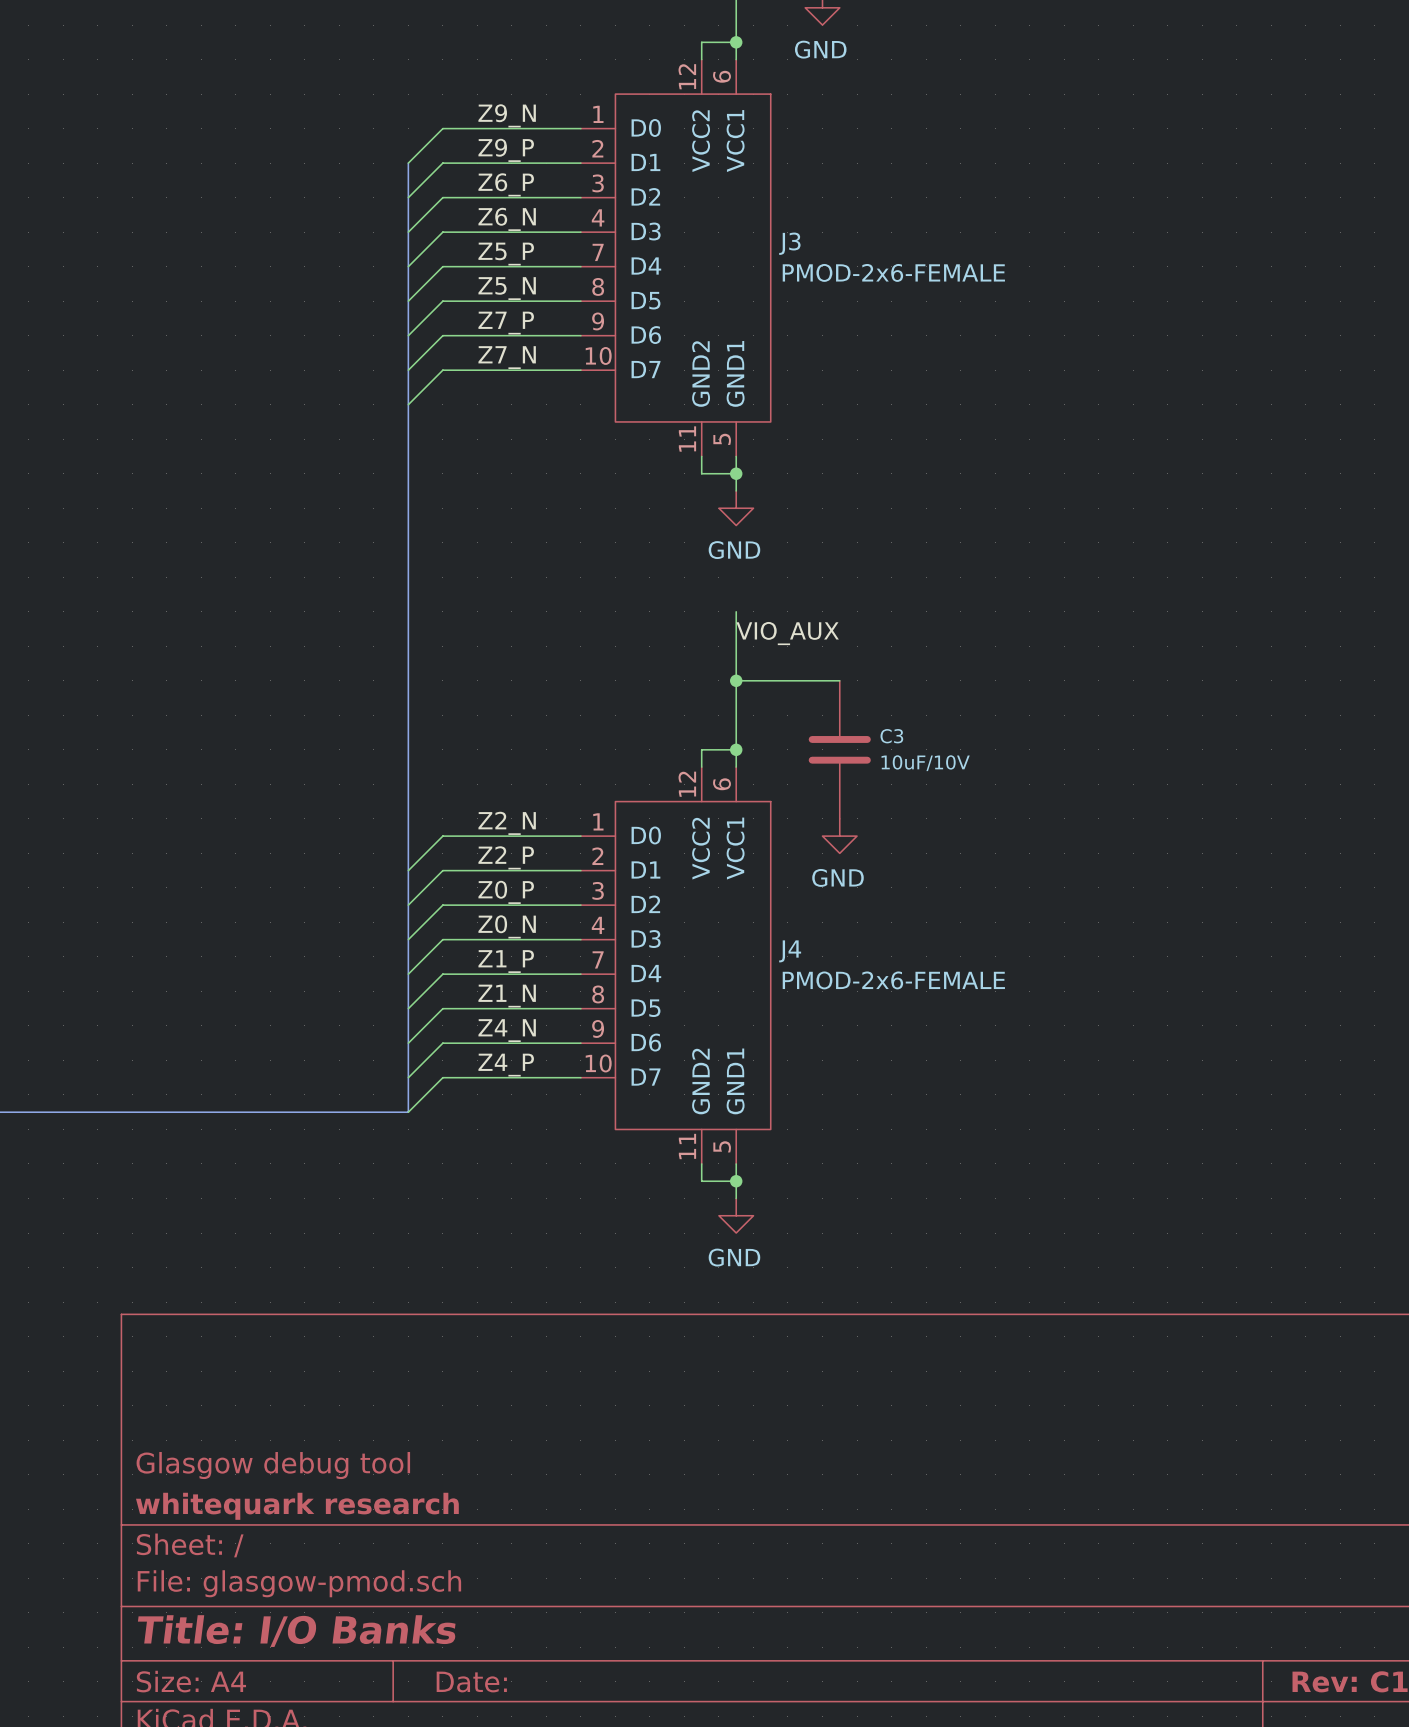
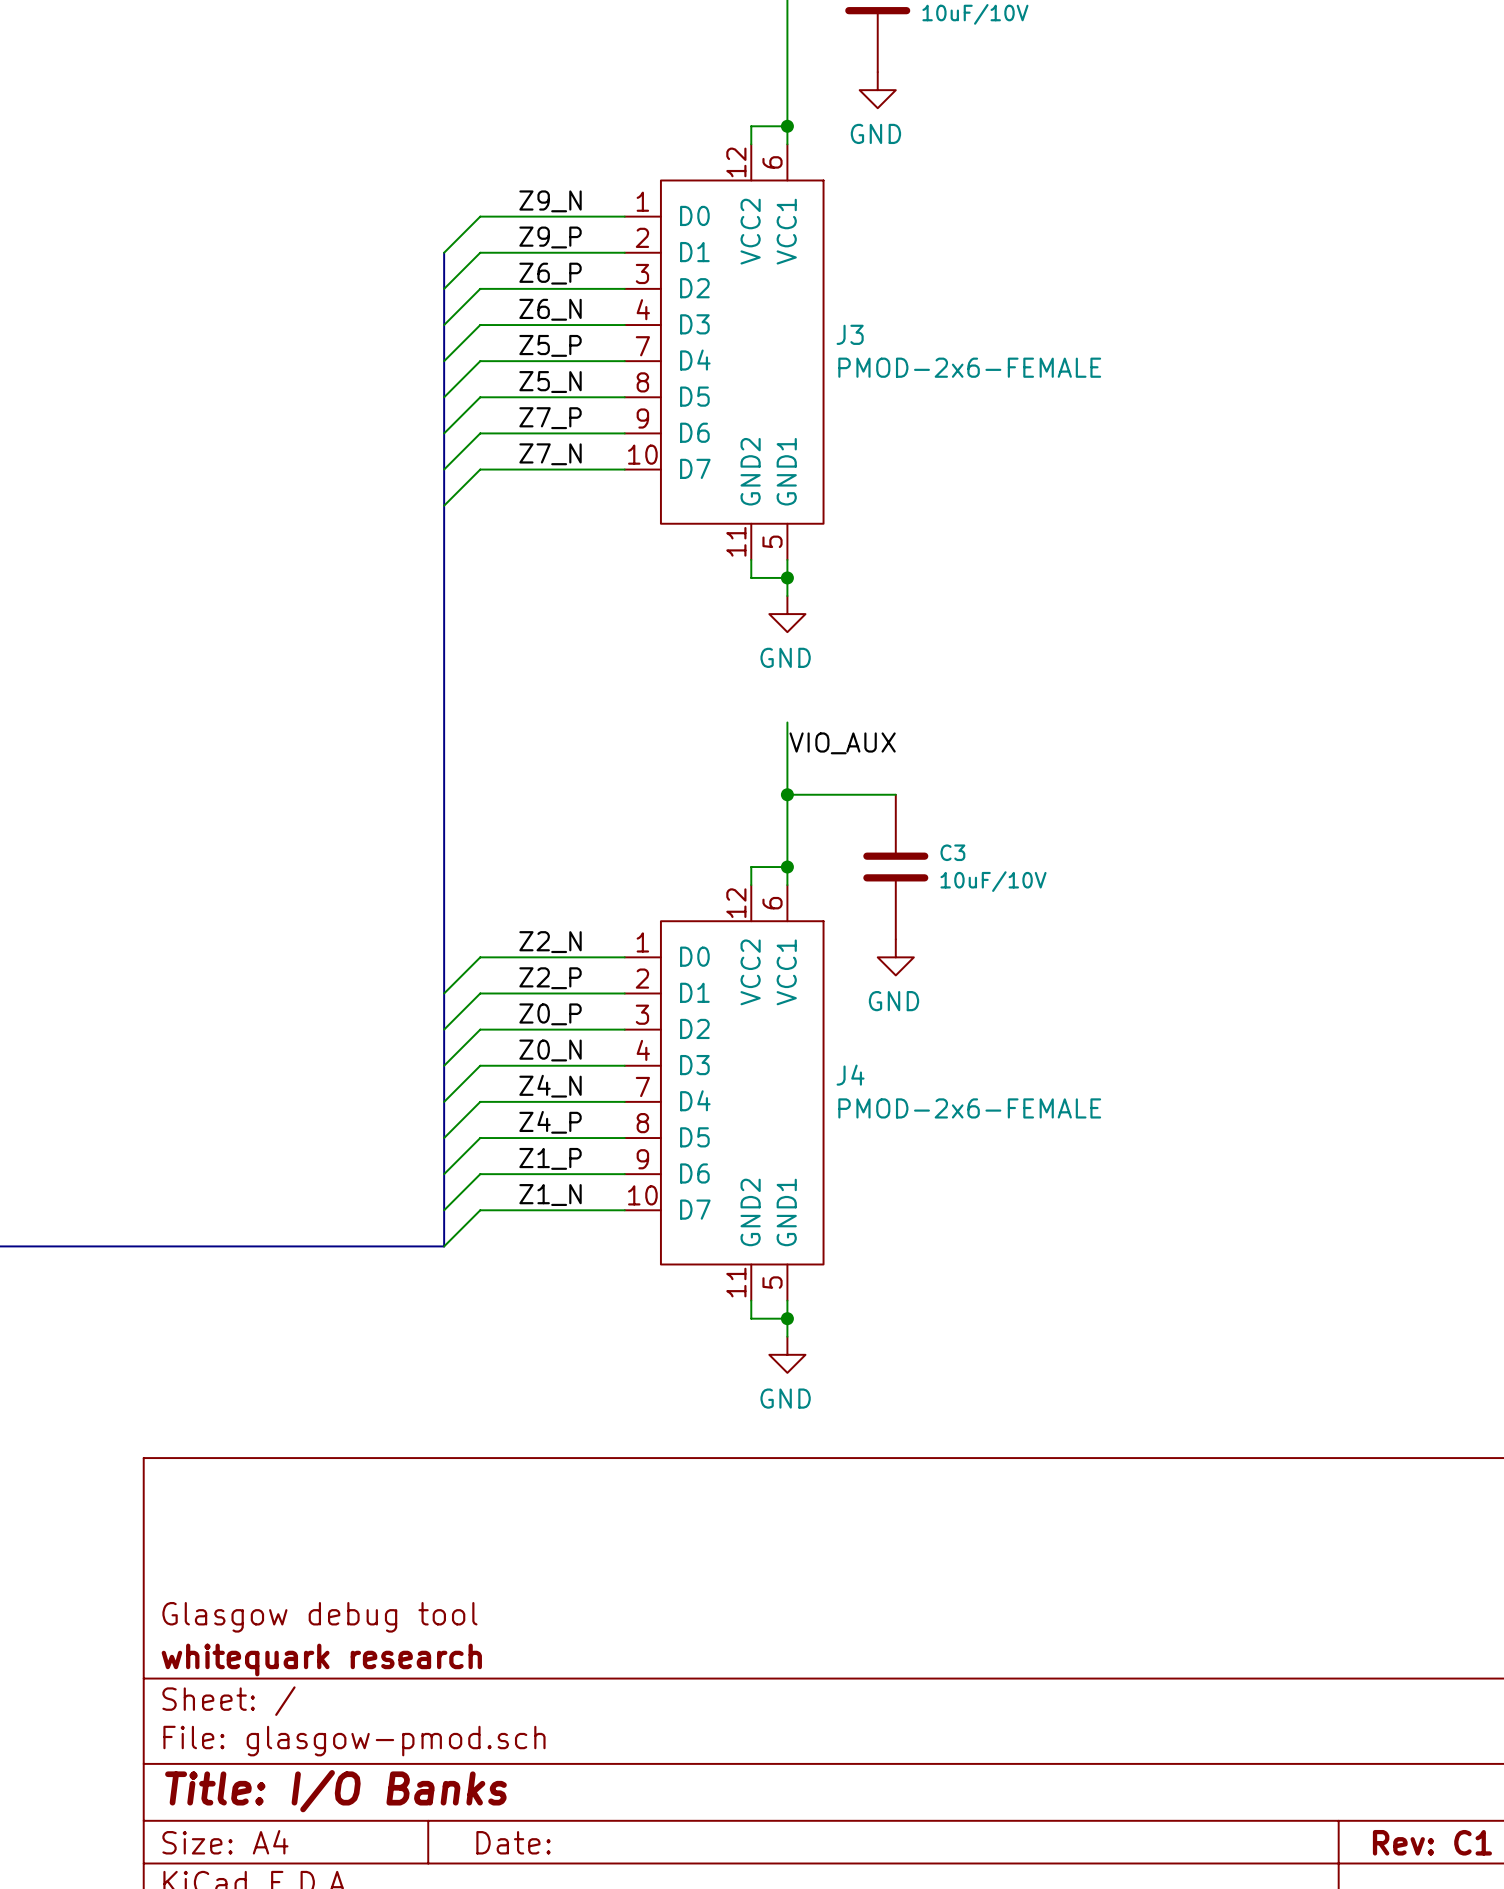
label: Z1_P (506, 961) -> Z4_N (550, 1086)
label: Z1_N (507, 996) -> Z4_P (550, 1122)
label: Z4_N (507, 1030) -> Z1_P (550, 1158)
label: Z4_P (506, 1065) -> Z1_N (550, 1195)

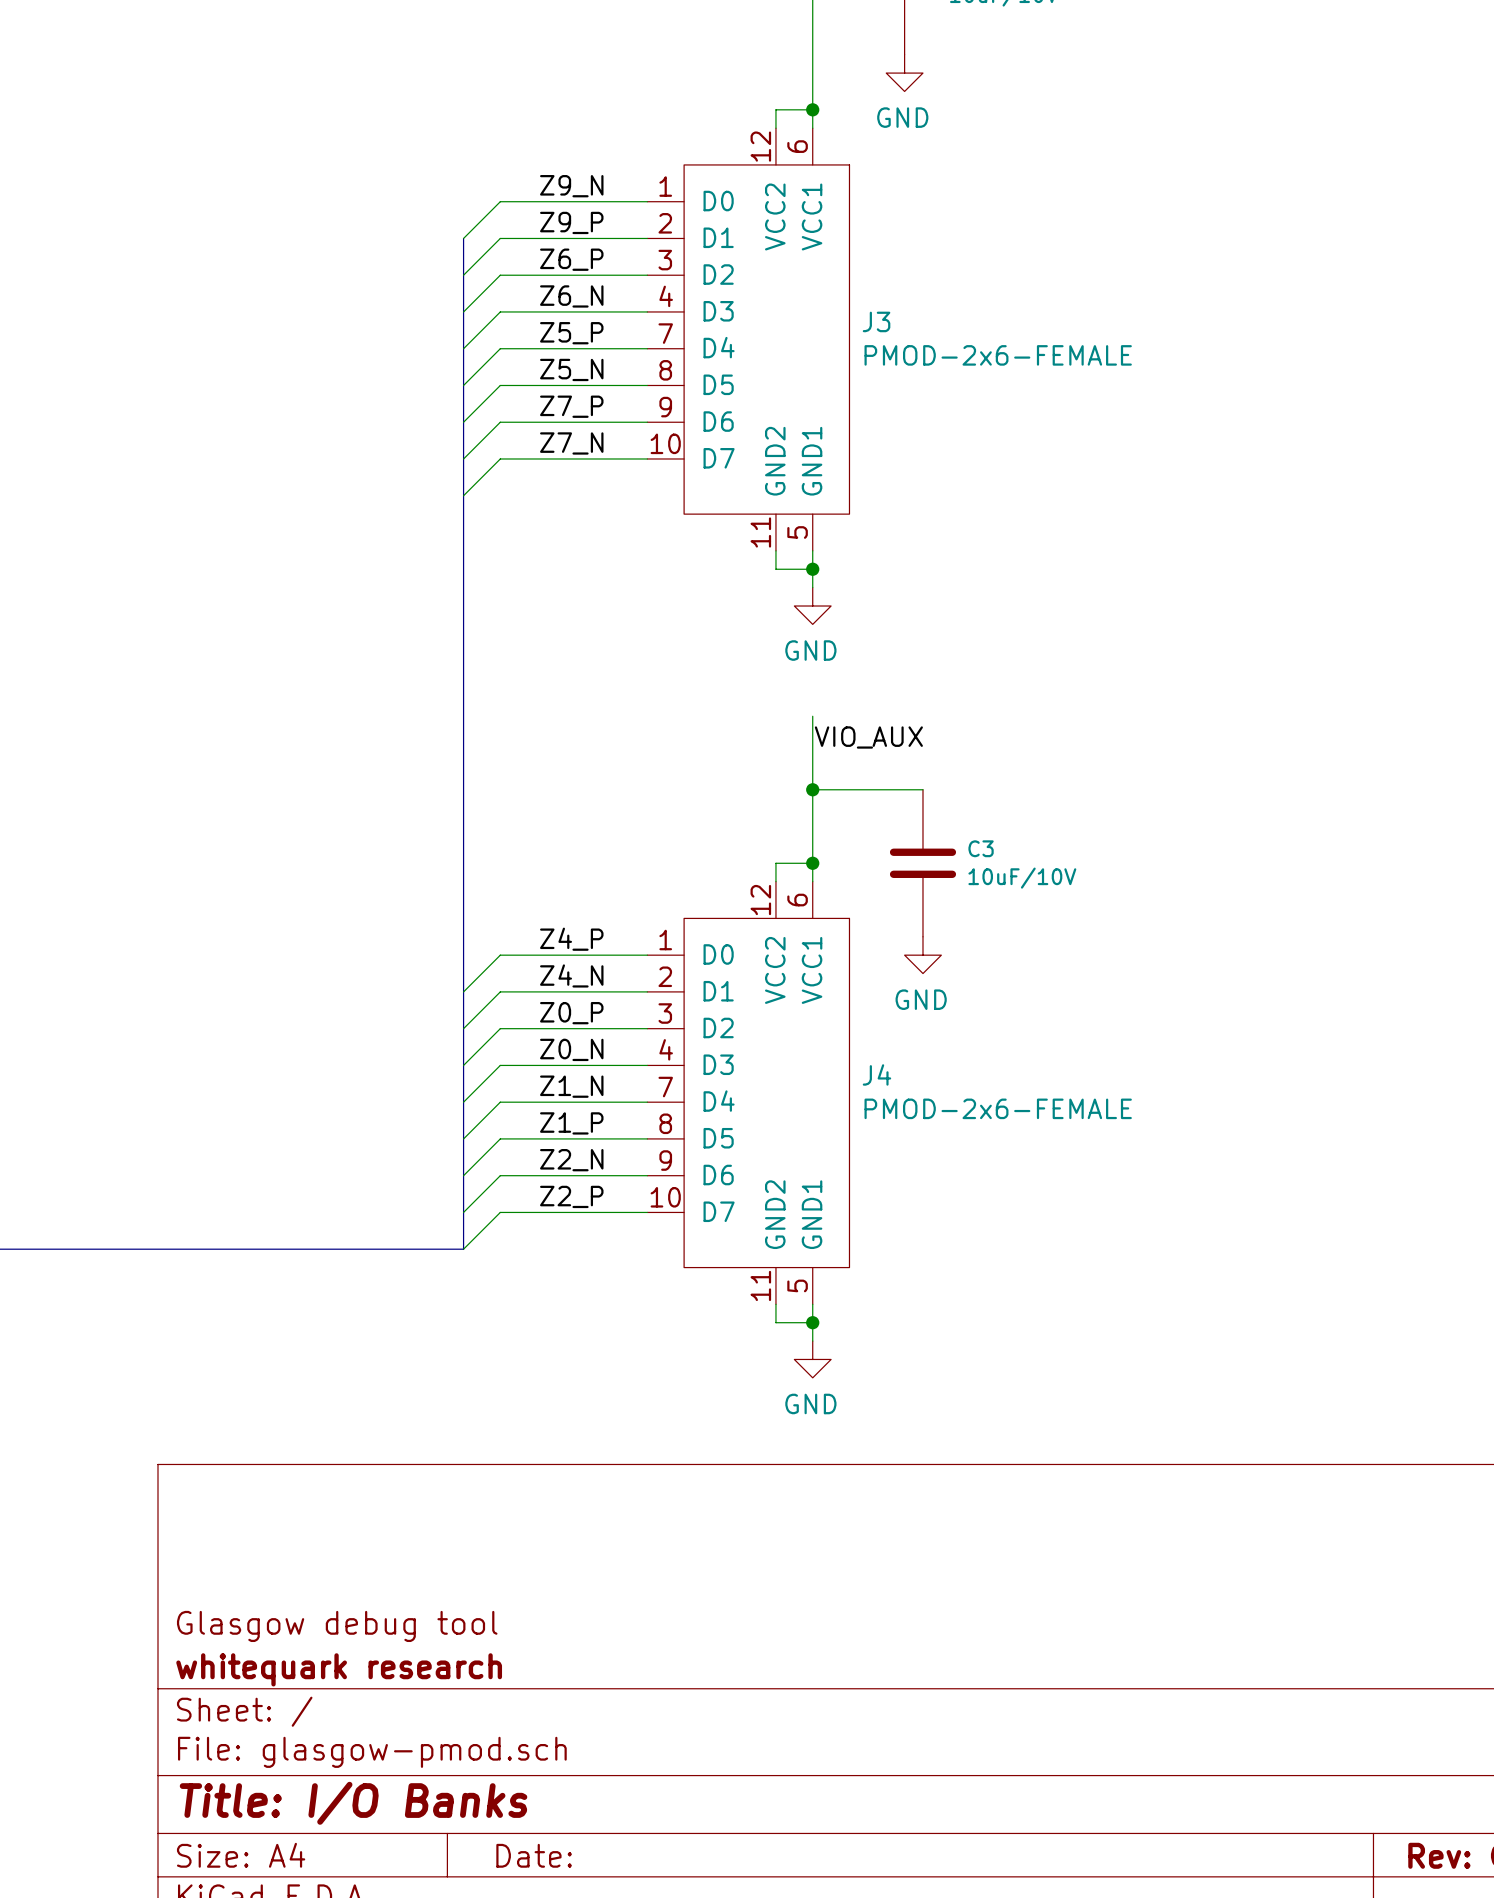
label: Z2_N (550, 942) -> Z4_P (571, 939)
label: Z2_P (550, 978) -> Z4_N (571, 975)
label: Z4_N (550, 1086) -> Z1_N (571, 1086)
label: Z4_P (550, 1122) -> Z1_P (571, 1123)
label: Z1_P (550, 1158) -> Z2_N (571, 1160)
label: Z1_N (550, 1195) -> Z2_P (571, 1196)

